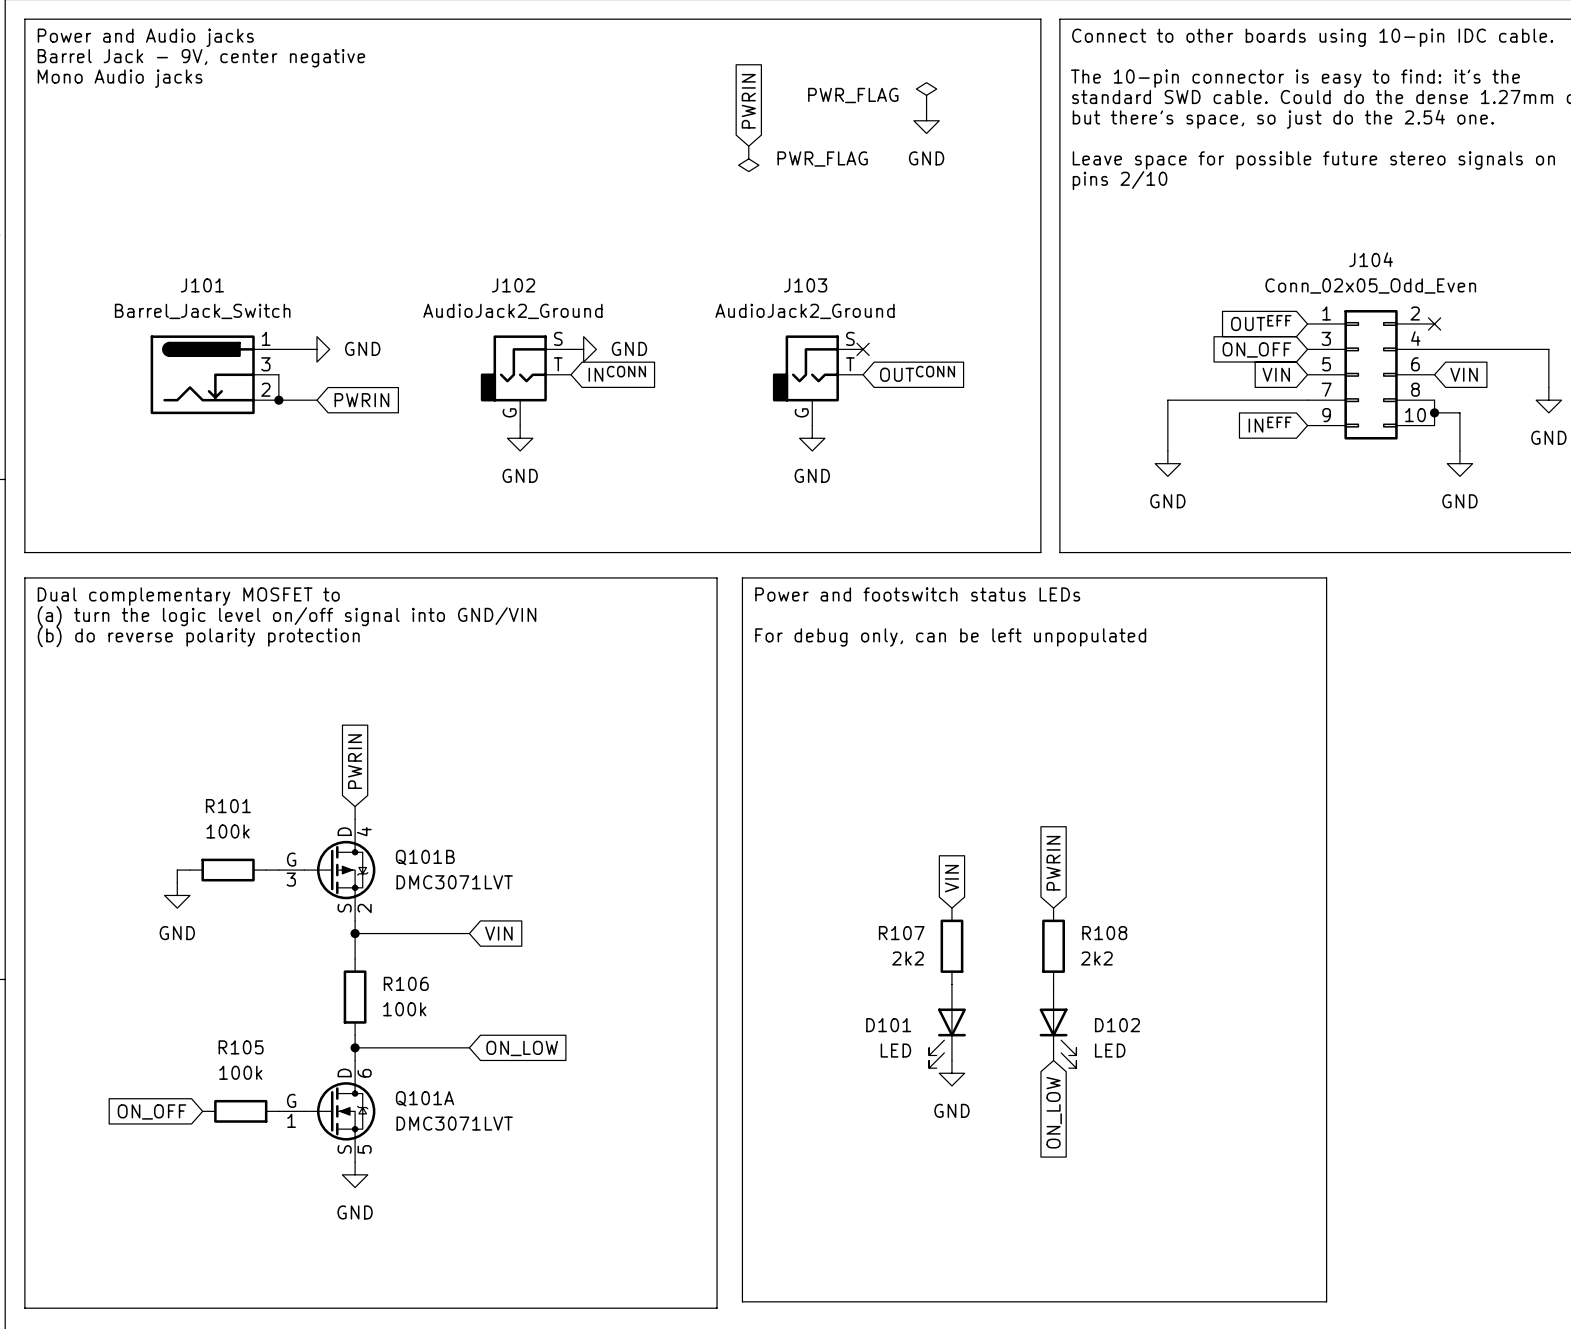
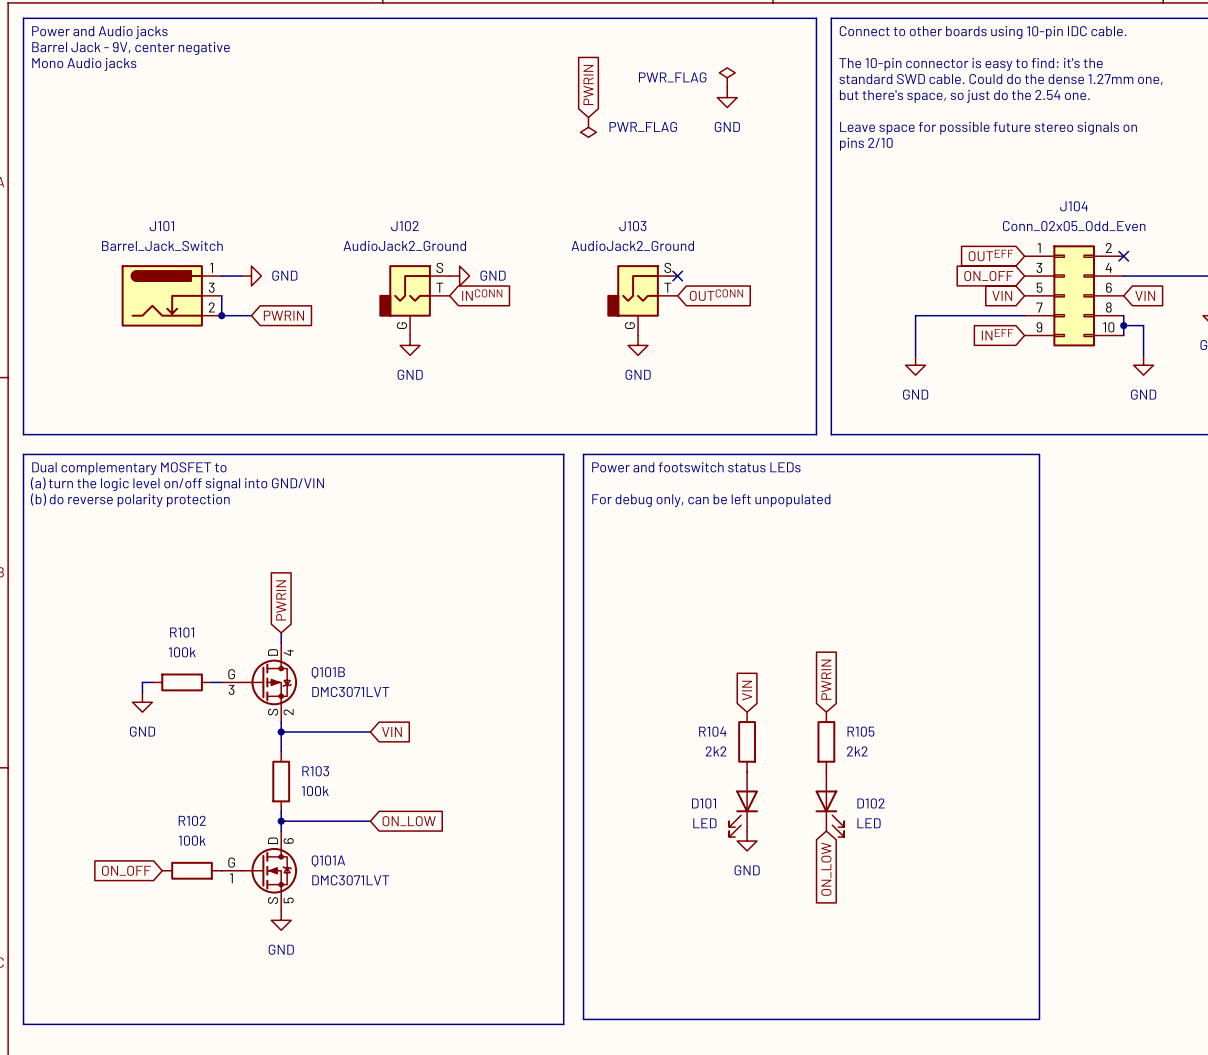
R107 name: R107 (901, 933) -> R104 (712, 731)
R108 name: R108 (1104, 933) -> R105 (860, 731)
R106 name: R106 (406, 983) -> R103 (315, 771)
R105 name: R105 (241, 1047) -> R102 (192, 820)

